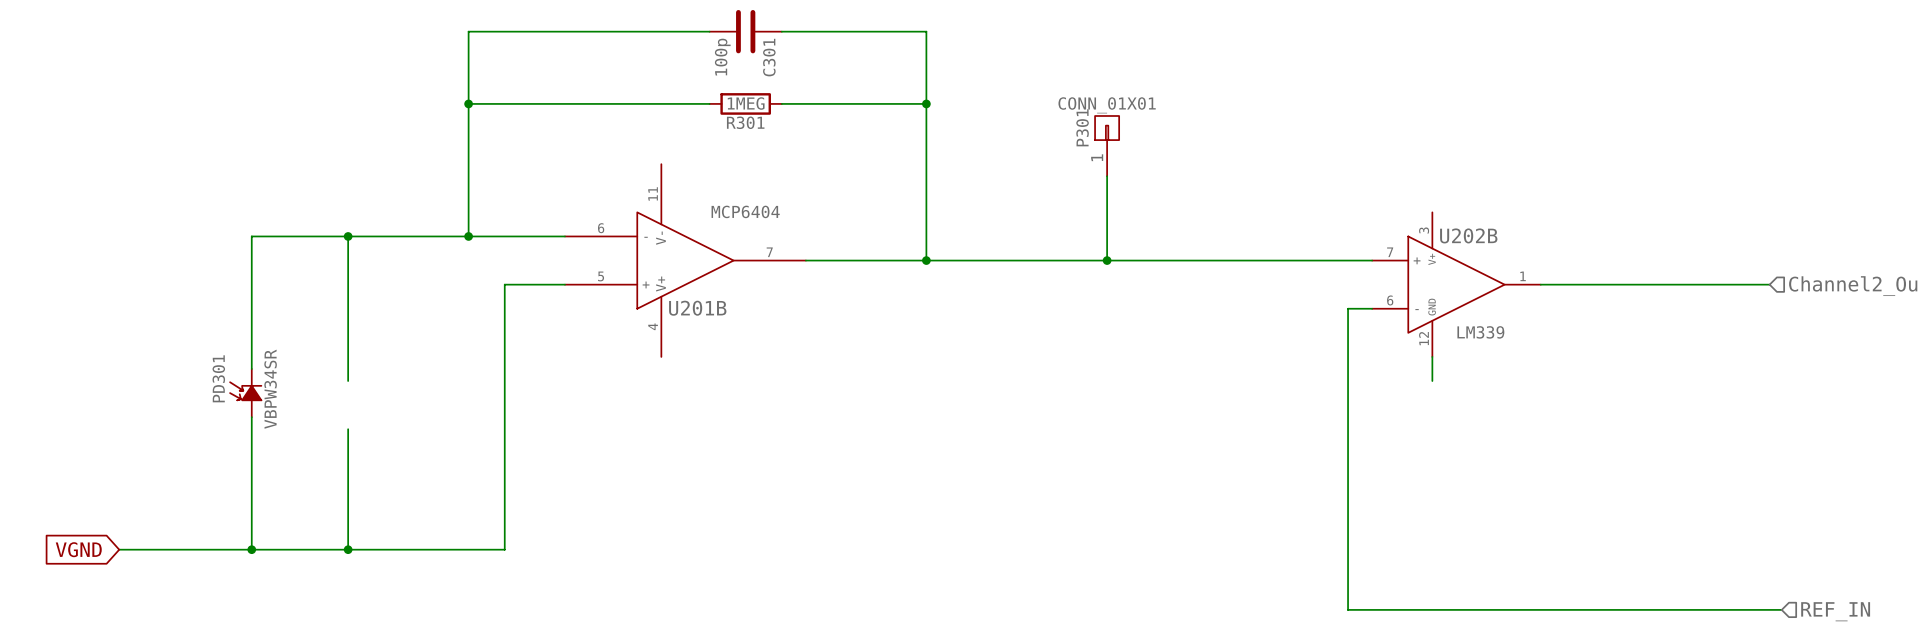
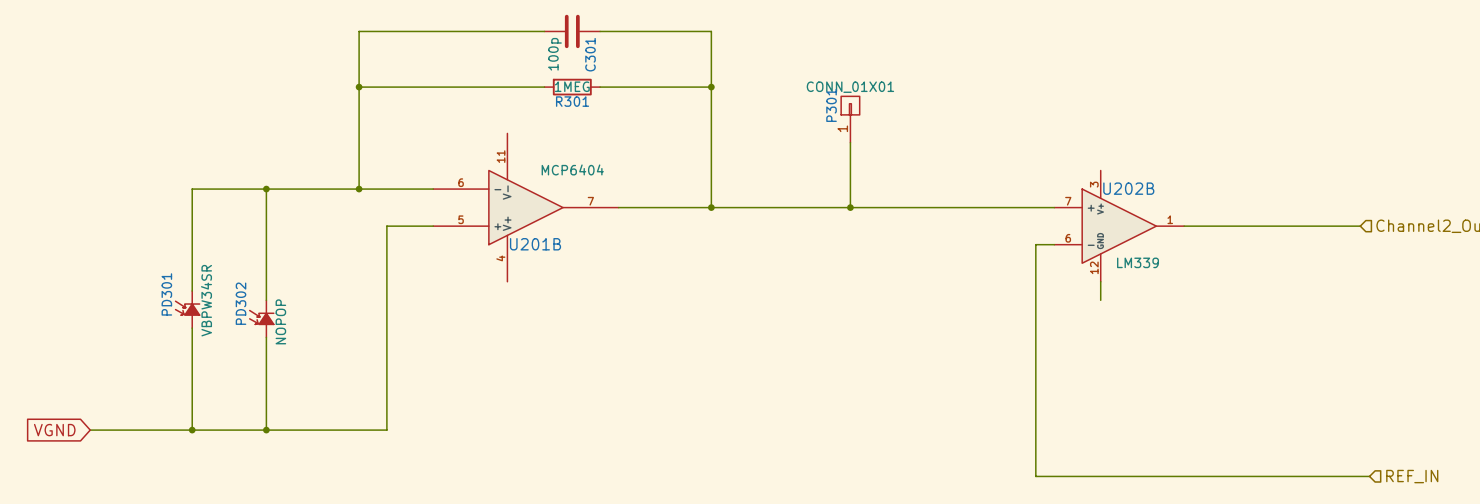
PD302: none -> NOPOP (261, 318)

